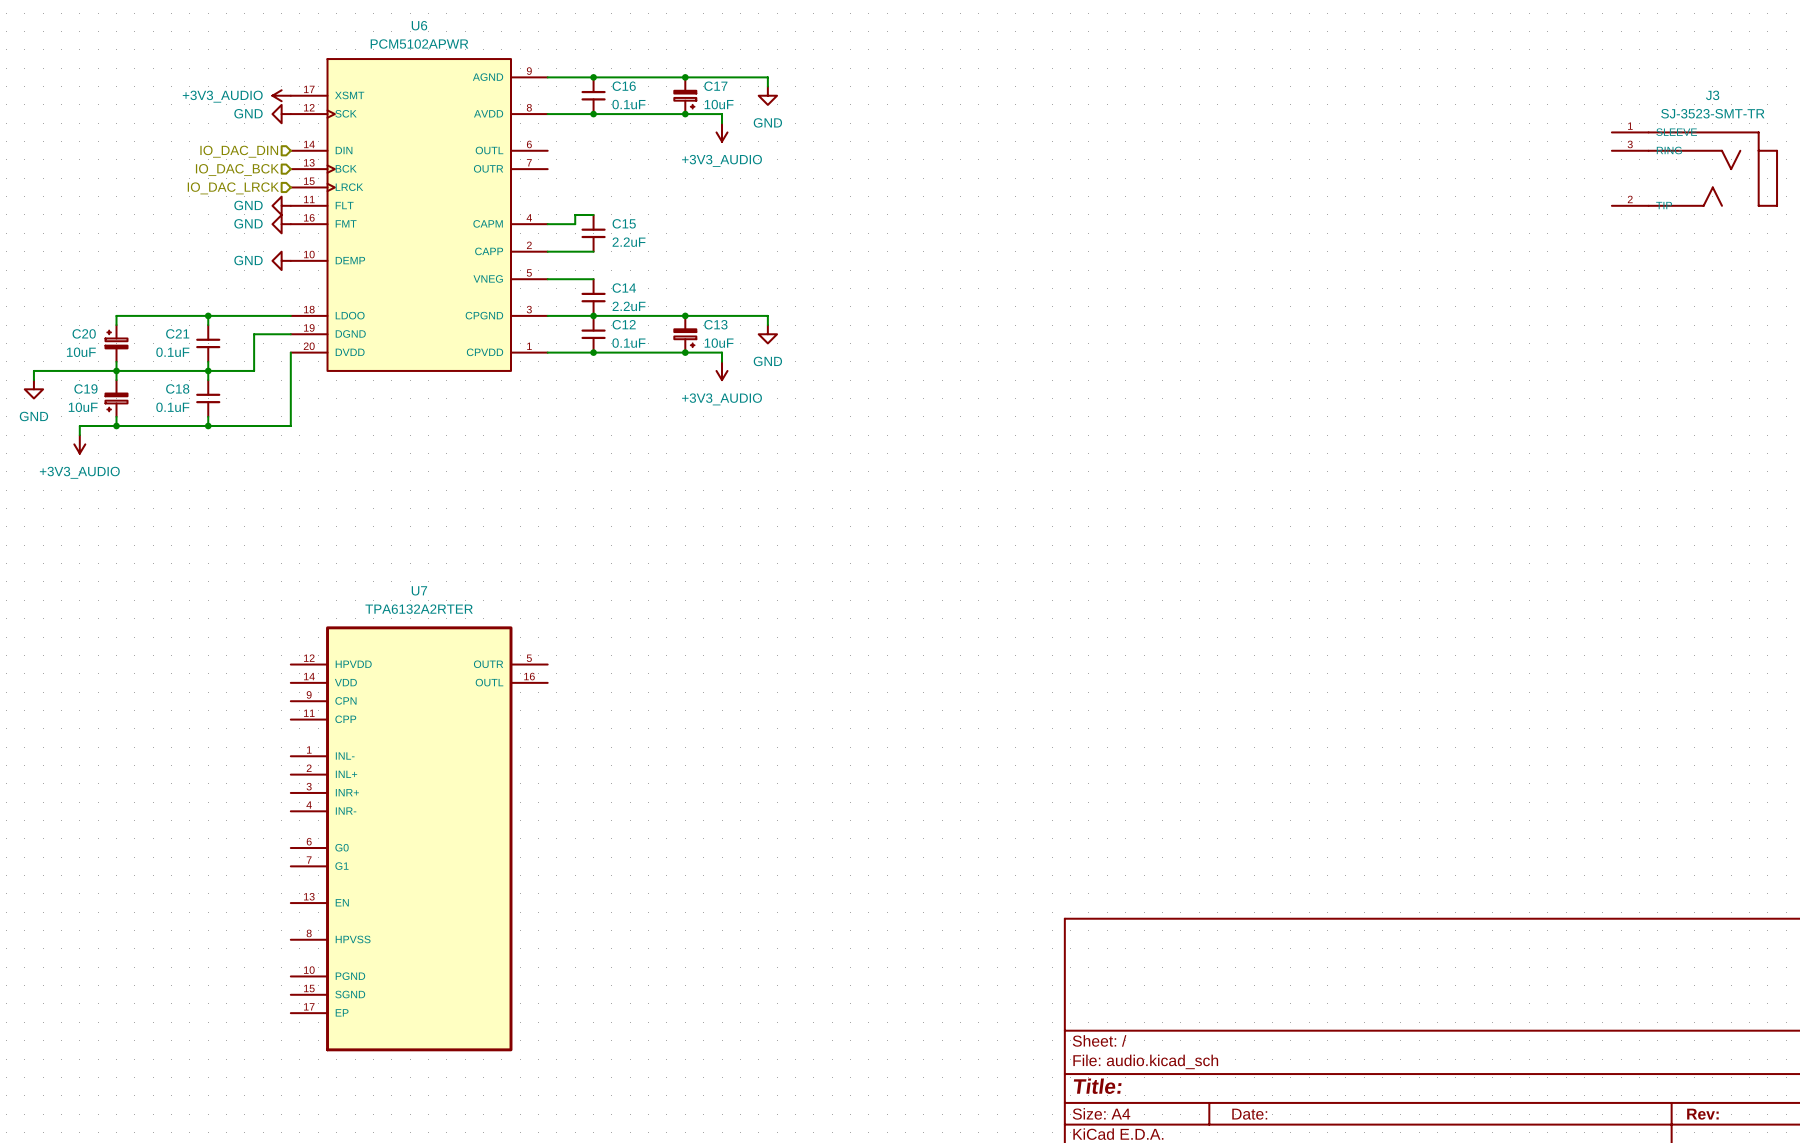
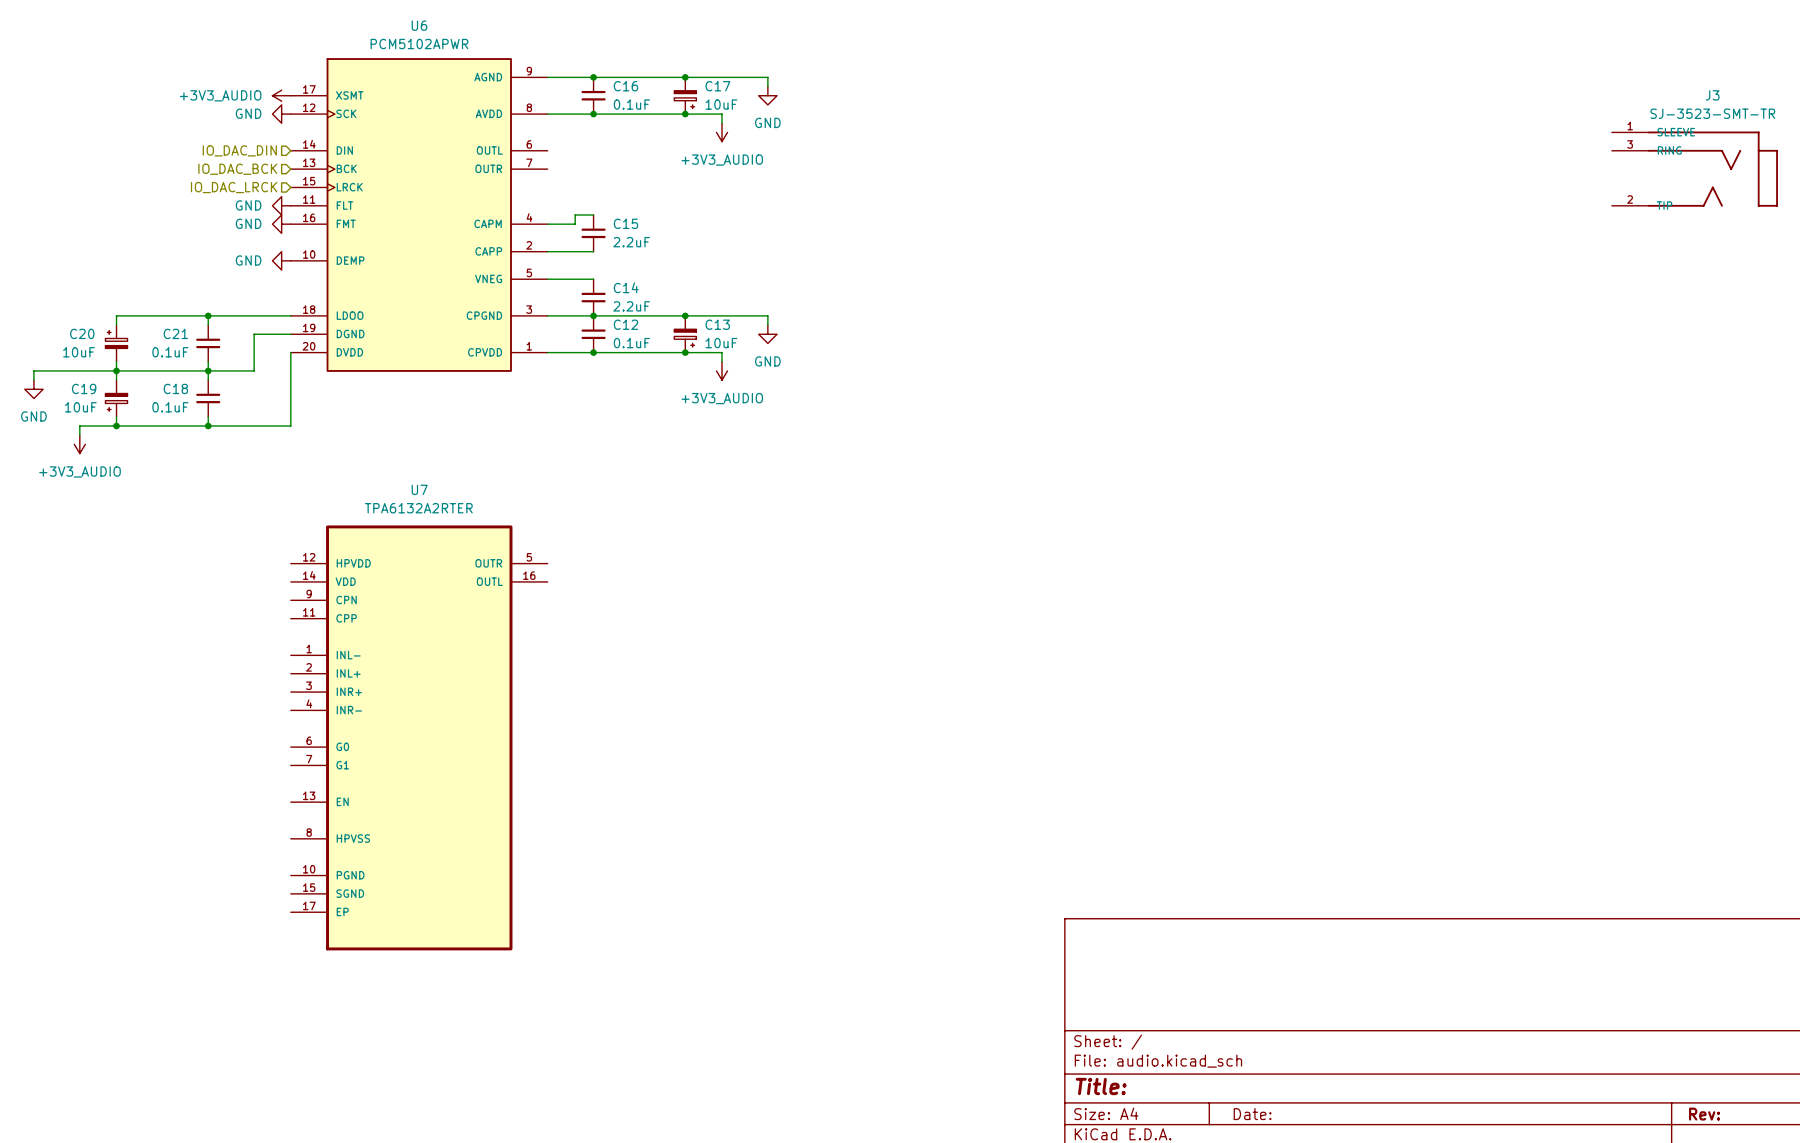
U7 position: (419, 838) -> (419, 737)

